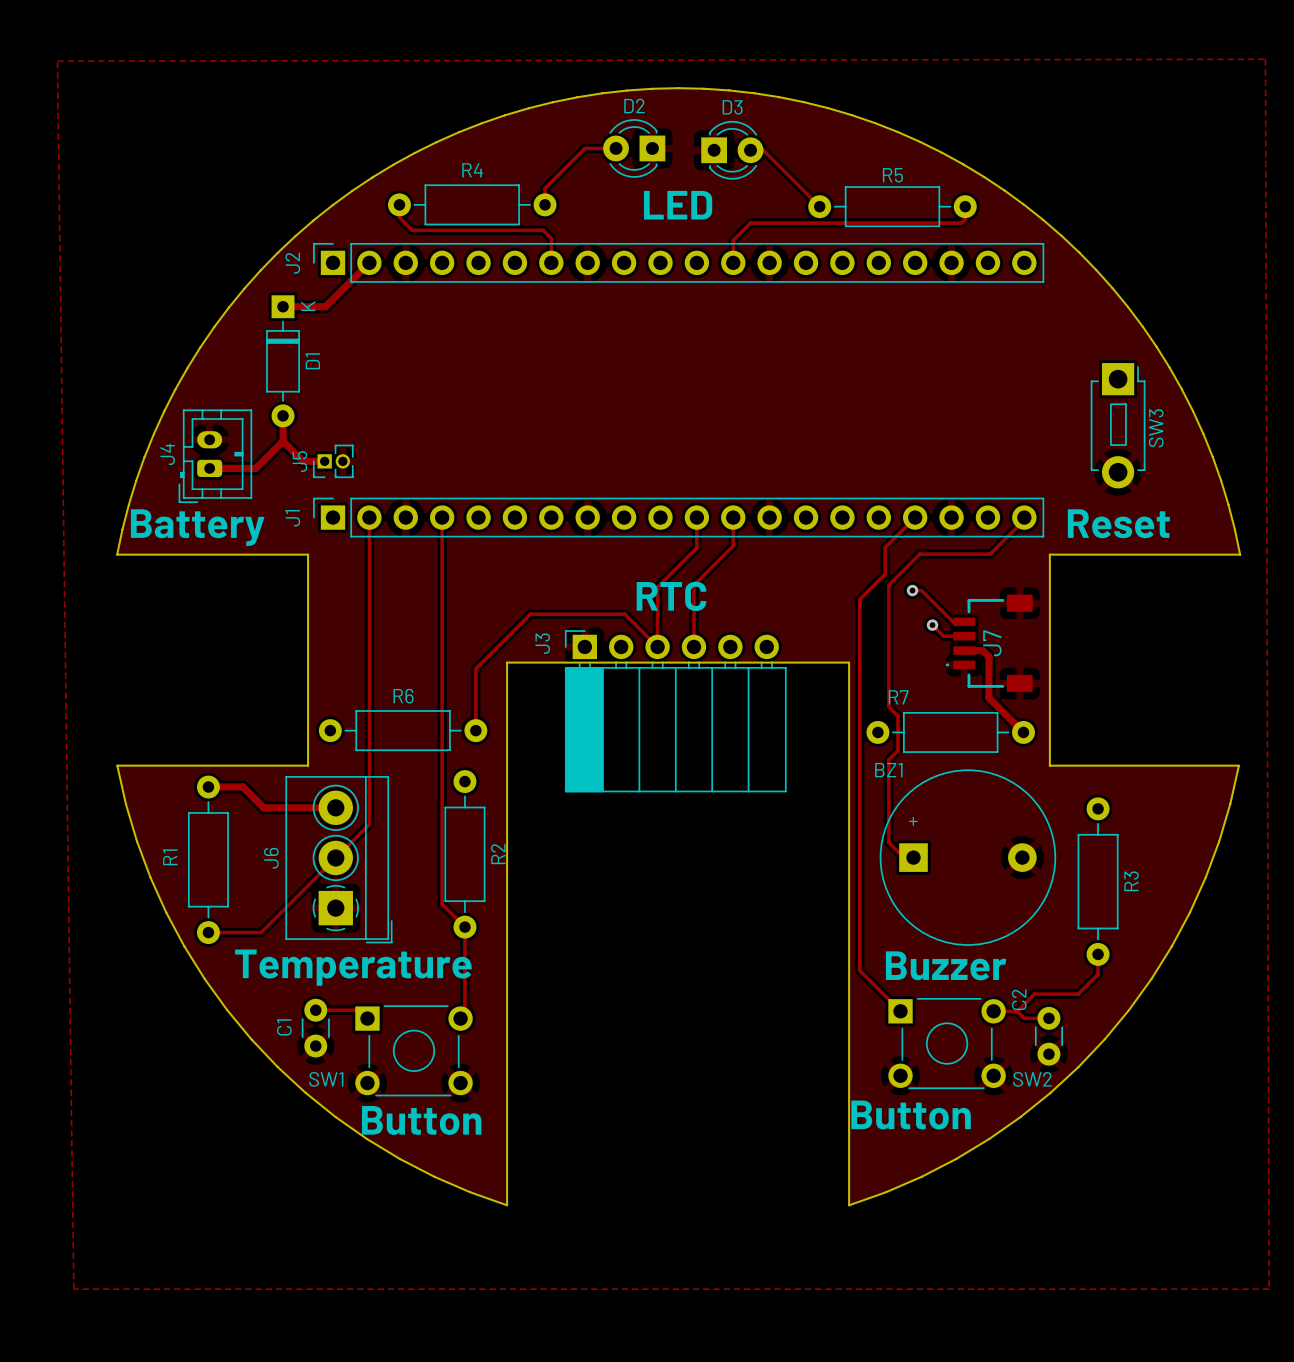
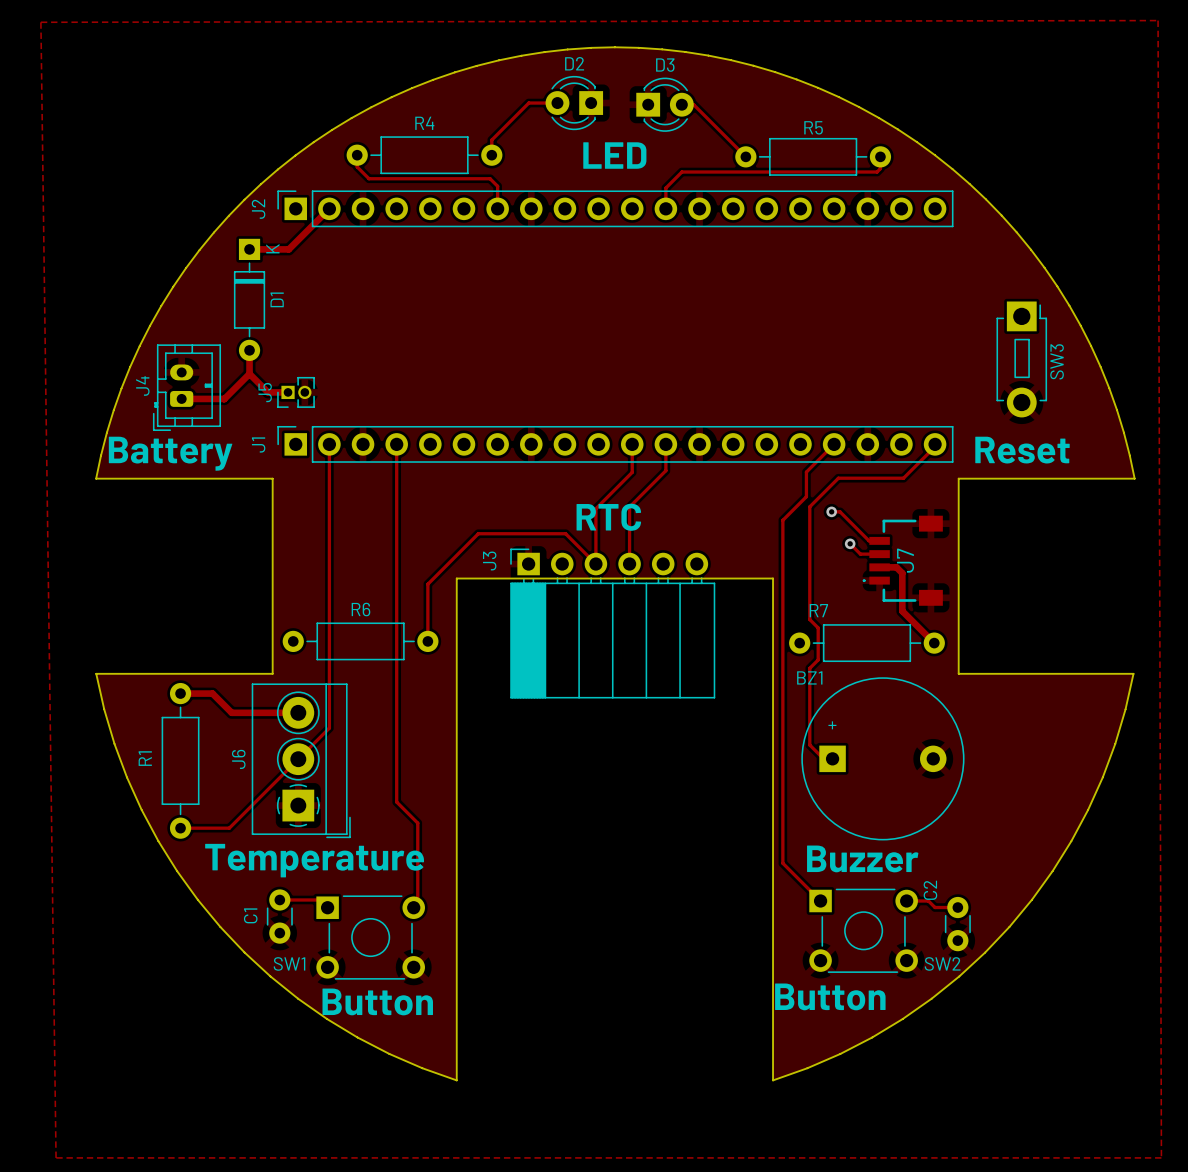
R2: (464, 854) -> none
R3: (1098, 881) -> none
track: (1098, 954) (1098, 974) (1078, 994) (1034, 994) (1017, 1011) -> none

